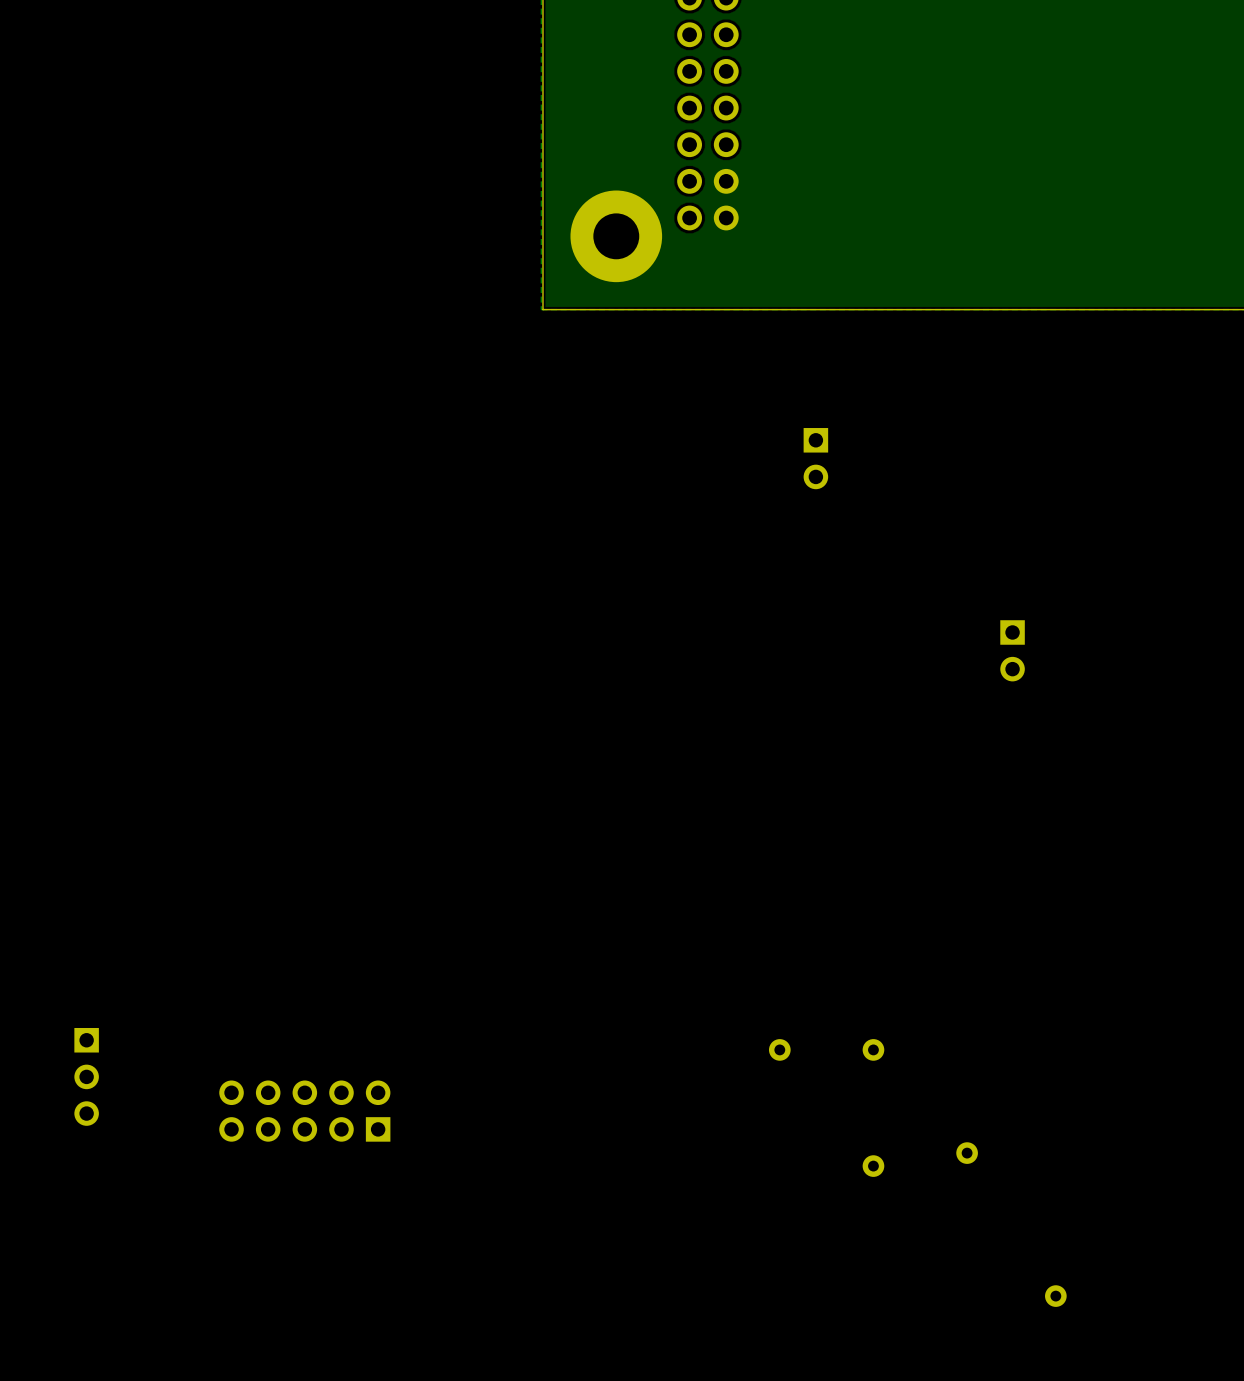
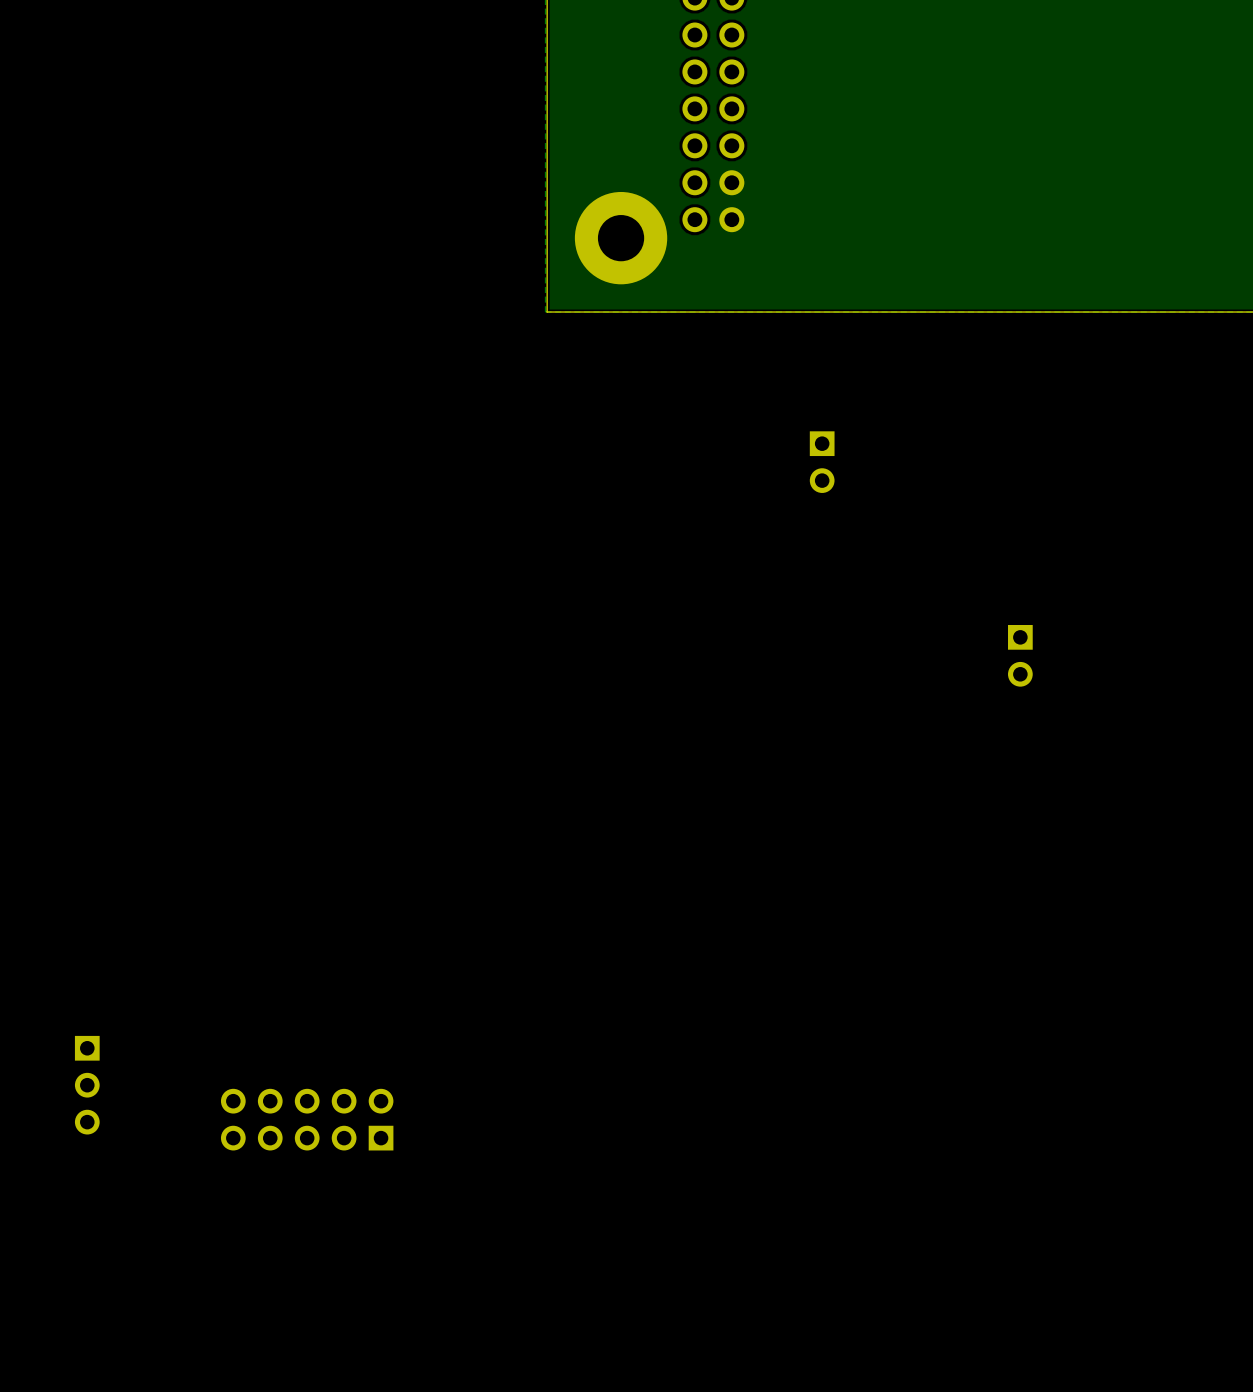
part: (779, 1049) -> none
part: (873, 1049) -> none
part: (967, 1153) -> none
part: (873, 1166) -> none
part: (1055, 1296) -> none

